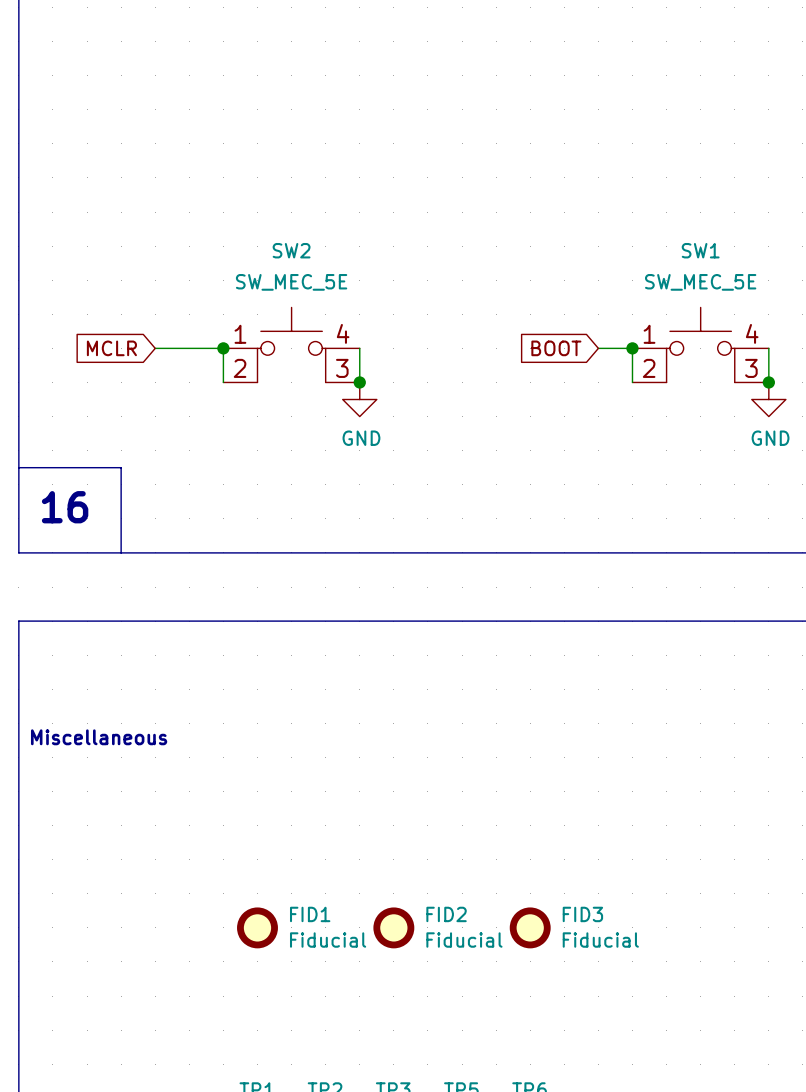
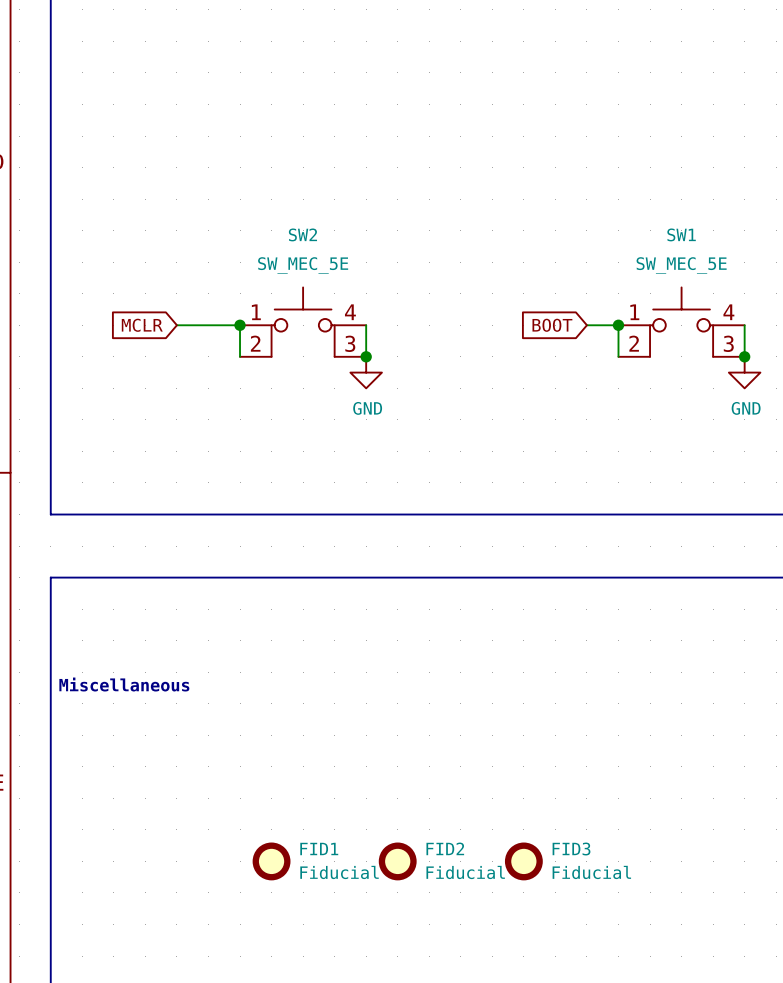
line: (18, 467) (121, 467) (121, 552) -> none
text: 16 (65, 507) -> none

